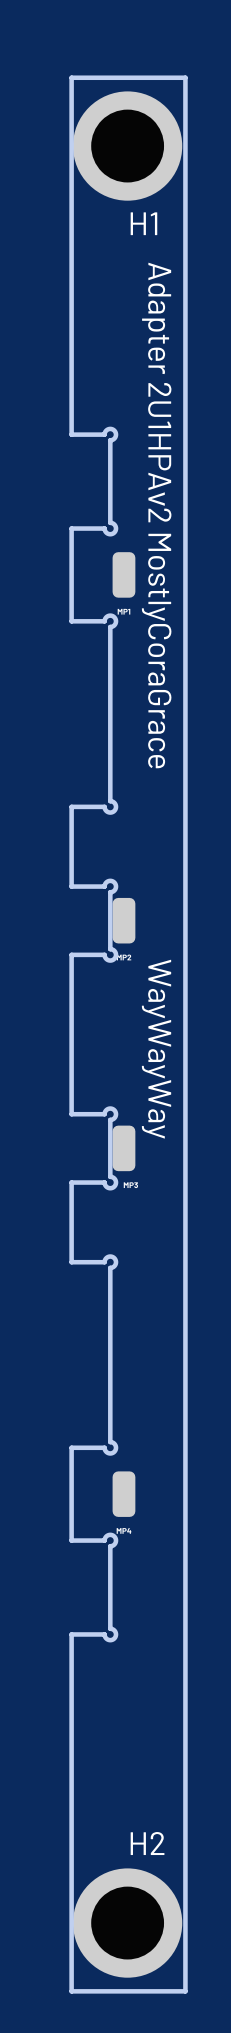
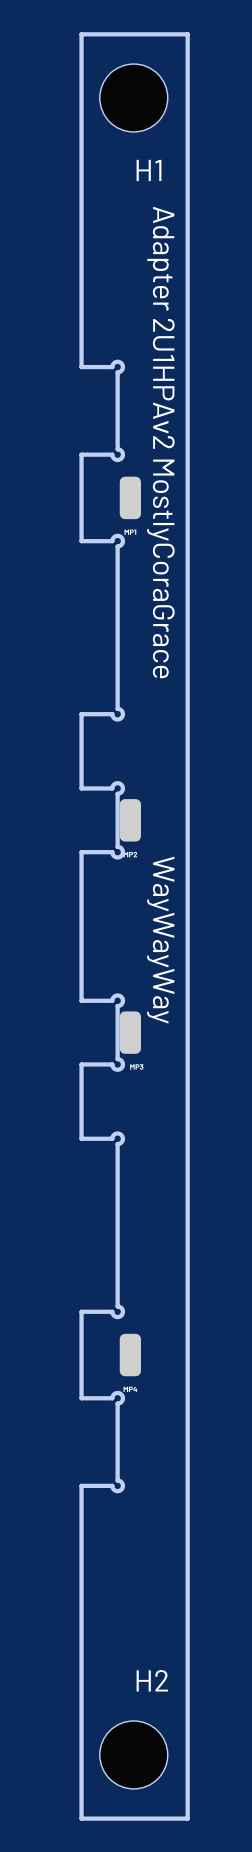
H1 footprint: [72, 91, 183, 201] -> [99, 64, 168, 132]
H2 footprint: [72, 1868, 183, 1978] -> [99, 1720, 168, 1789]

